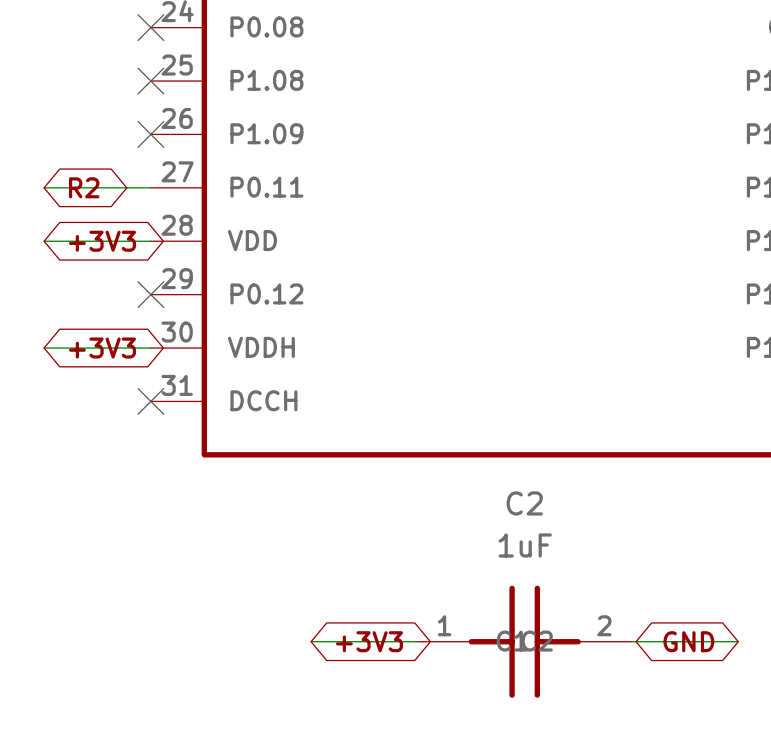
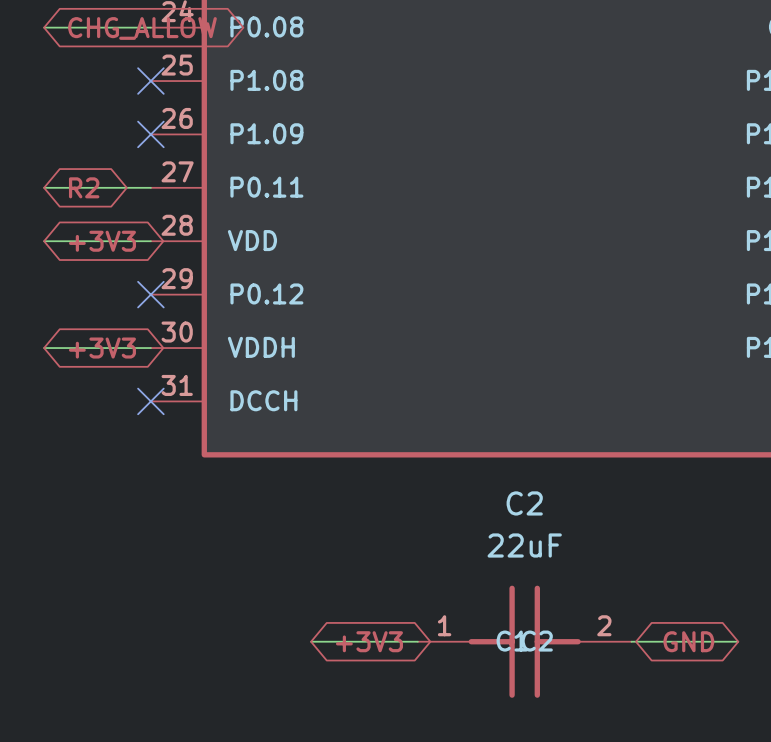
wire: none -> (44, 27) (150, 27)
no-connect mark: (150, 27) -> none
global label: none -> CHG_ALLOW (142, 28)
C2 value: 1uF (525, 545) -> 22uF (524, 545)

